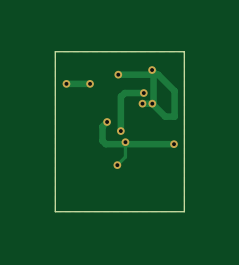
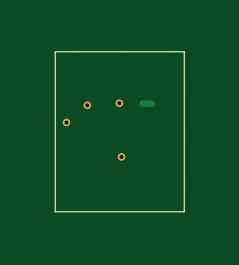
track: (152, 70) (153, 71) (153, 102) (152, 103) (165, 116) (174, 116) (174, 91) (158, 74) (118, 74) -> none
via: (152, 70) -> none
via: (118, 74) -> none
via: (66, 83) -> none
track: (90, 83) (66, 83) -> none
via: (90, 83) -> none
track: (143, 93) (124, 93) (120, 96) (120, 131) -> none
via: (143, 93) -> none
via: none -> (119, 103)
via: (142, 103) -> none
via: (152, 103) -> none
via: none -> (87, 105)
track: (107, 121) (102, 126) (102, 140) (105, 144) (174, 144) -> none
via: (107, 121) -> none
via: none -> (66, 122)
via: (120, 131) -> none
track: (125, 142) (125, 157) (117, 165) -> none
via: (125, 142) -> none
via: (174, 144) -> none
via: none -> (121, 156)
via: (117, 165) -> none

